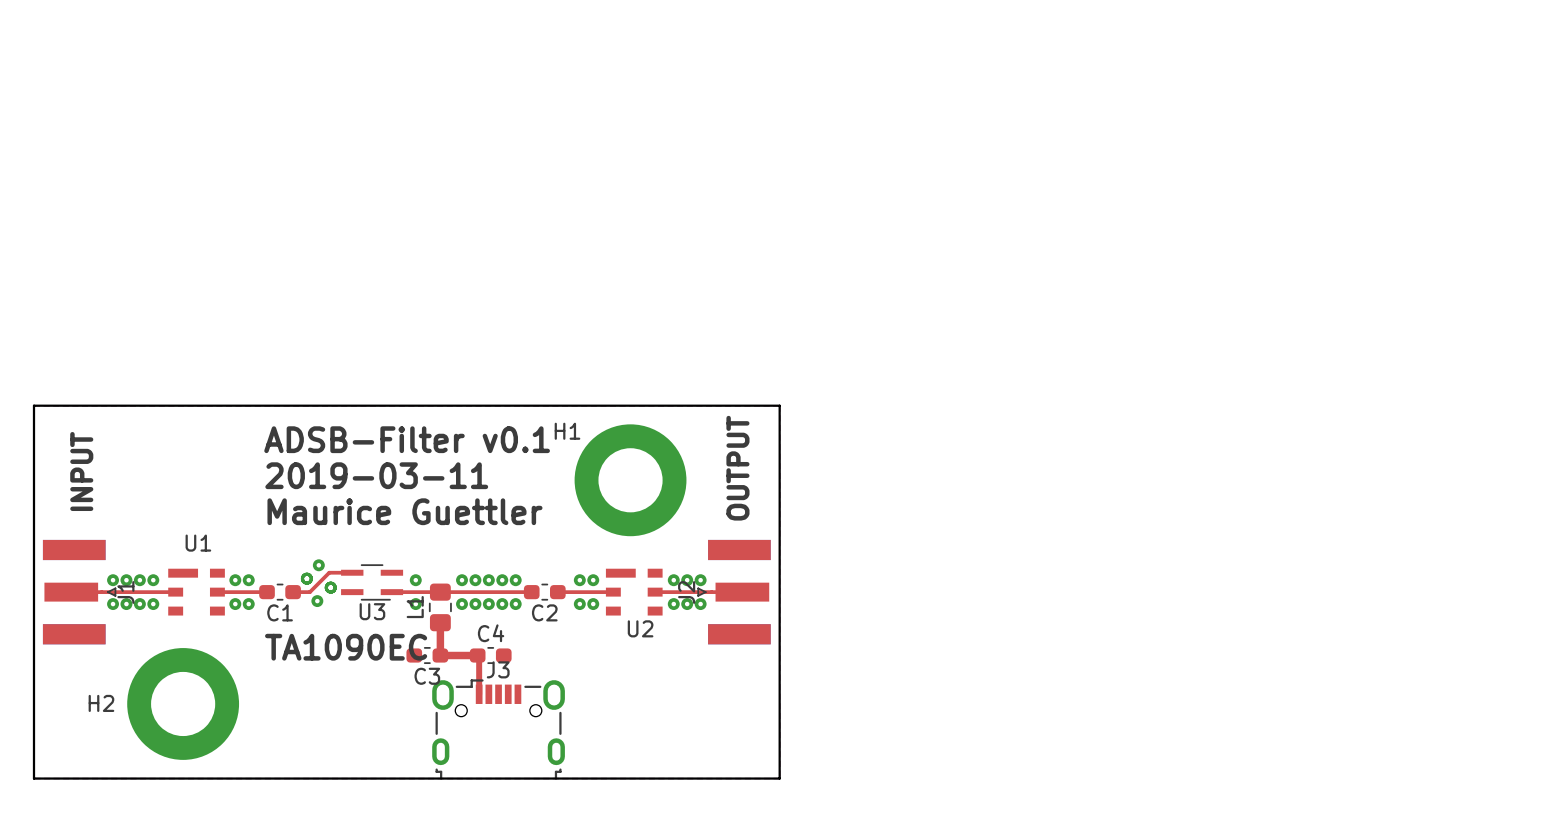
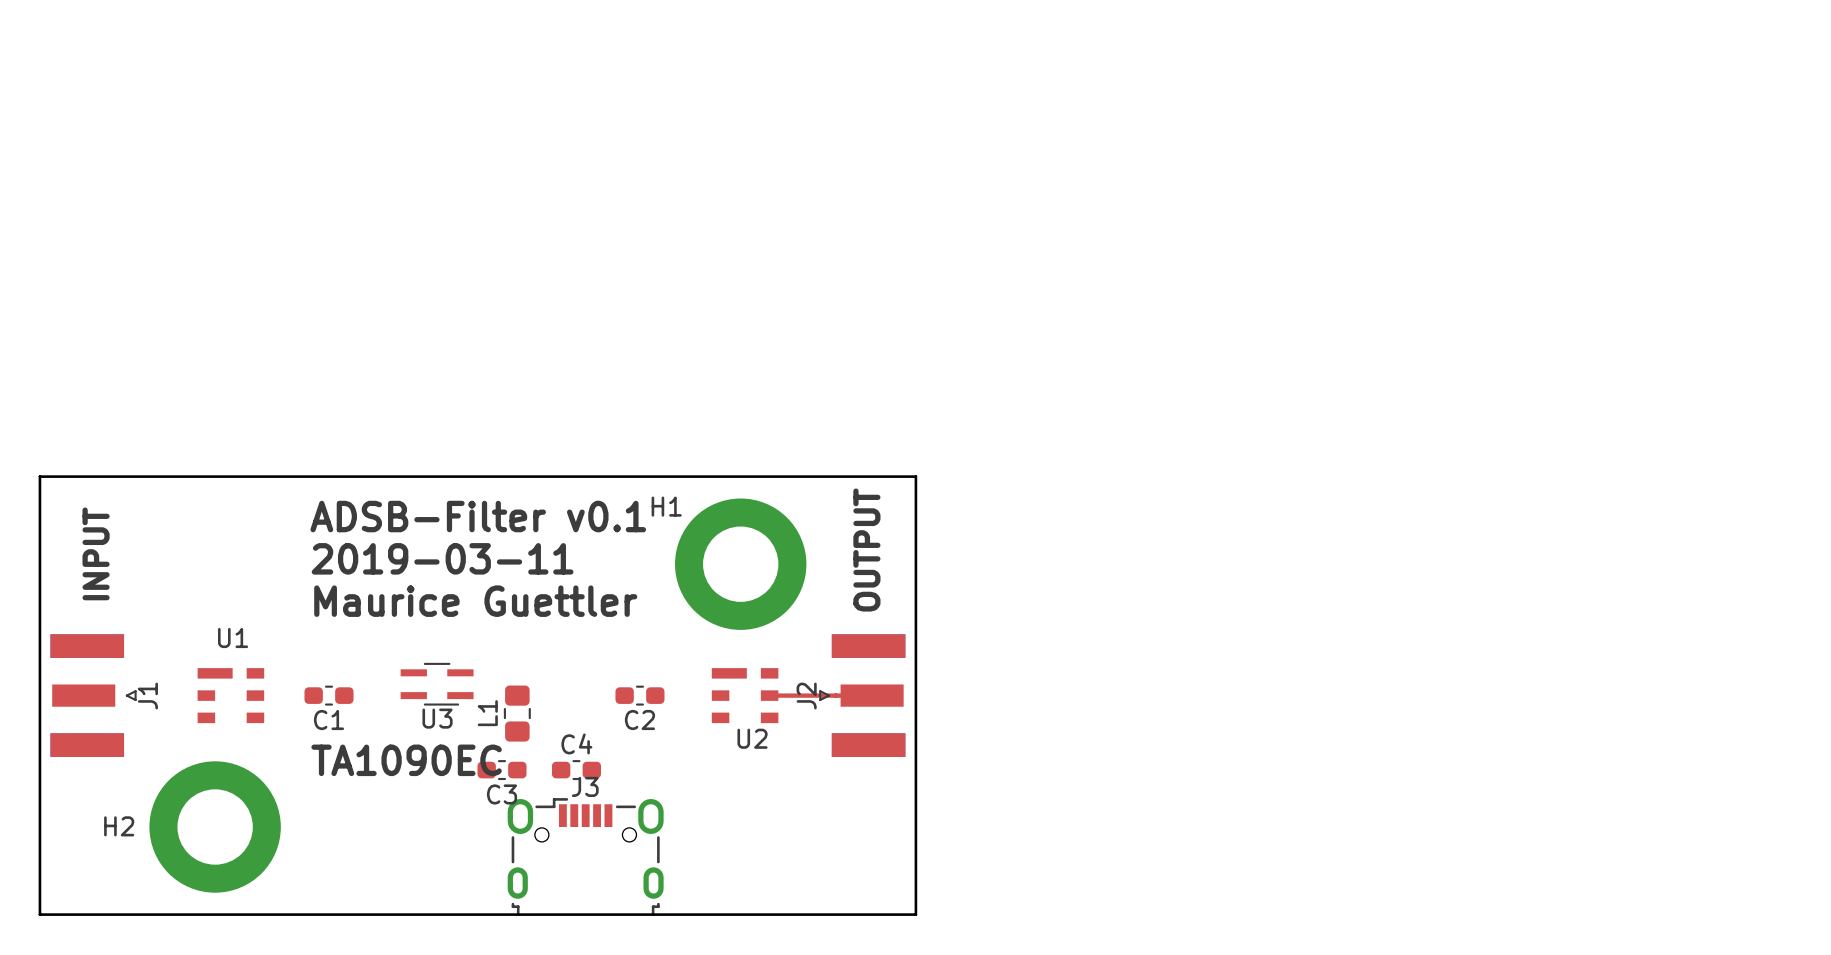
via: (318, 565) -> none
top track: (352, 572) (329, 572) (309, 592) (293, 592) -> none
via: (306, 578) -> none
via: (113, 580) -> none
via: (126, 580) -> none
via: (139, 580) -> none
via: (153, 580) -> none
via: (235, 580) -> none
via: (248, 580) -> none
via: (415, 580) -> none
via: (462, 580) -> none
via: (475, 580) -> none
via: (488, 580) -> none
via: (502, 580) -> none
via: (515, 580) -> none
via: (579, 580) -> none
via: (593, 580) -> none
via: (673, 580) -> none
via: (687, 580) -> none
via: (700, 580) -> none
via: (330, 587) -> none
top track: (71, 592) (175, 592) -> none
top track: (217, 592) (267, 592) -> none
top track: (391, 592) (531, 592) -> none
top track: (557, 592) (613, 592) -> none
via: (317, 601) -> none
via: (113, 604) -> none
via: (126, 604) -> none
via: (139, 604) -> none
via: (153, 604) -> none
via: (235, 604) -> none
via: (248, 604) -> none
via: (415, 604) -> none
via: (462, 604) -> none
via: (475, 604) -> none
via: (488, 604) -> none
via: (502, 604) -> none
via: (515, 604) -> none
via: (579, 604) -> none
via: (593, 604) -> none
via: (673, 604) -> none
via: (687, 604) -> none
via: (700, 604) -> none
top track: (440, 622) (440, 655) (479, 657) (479, 694) -> none

